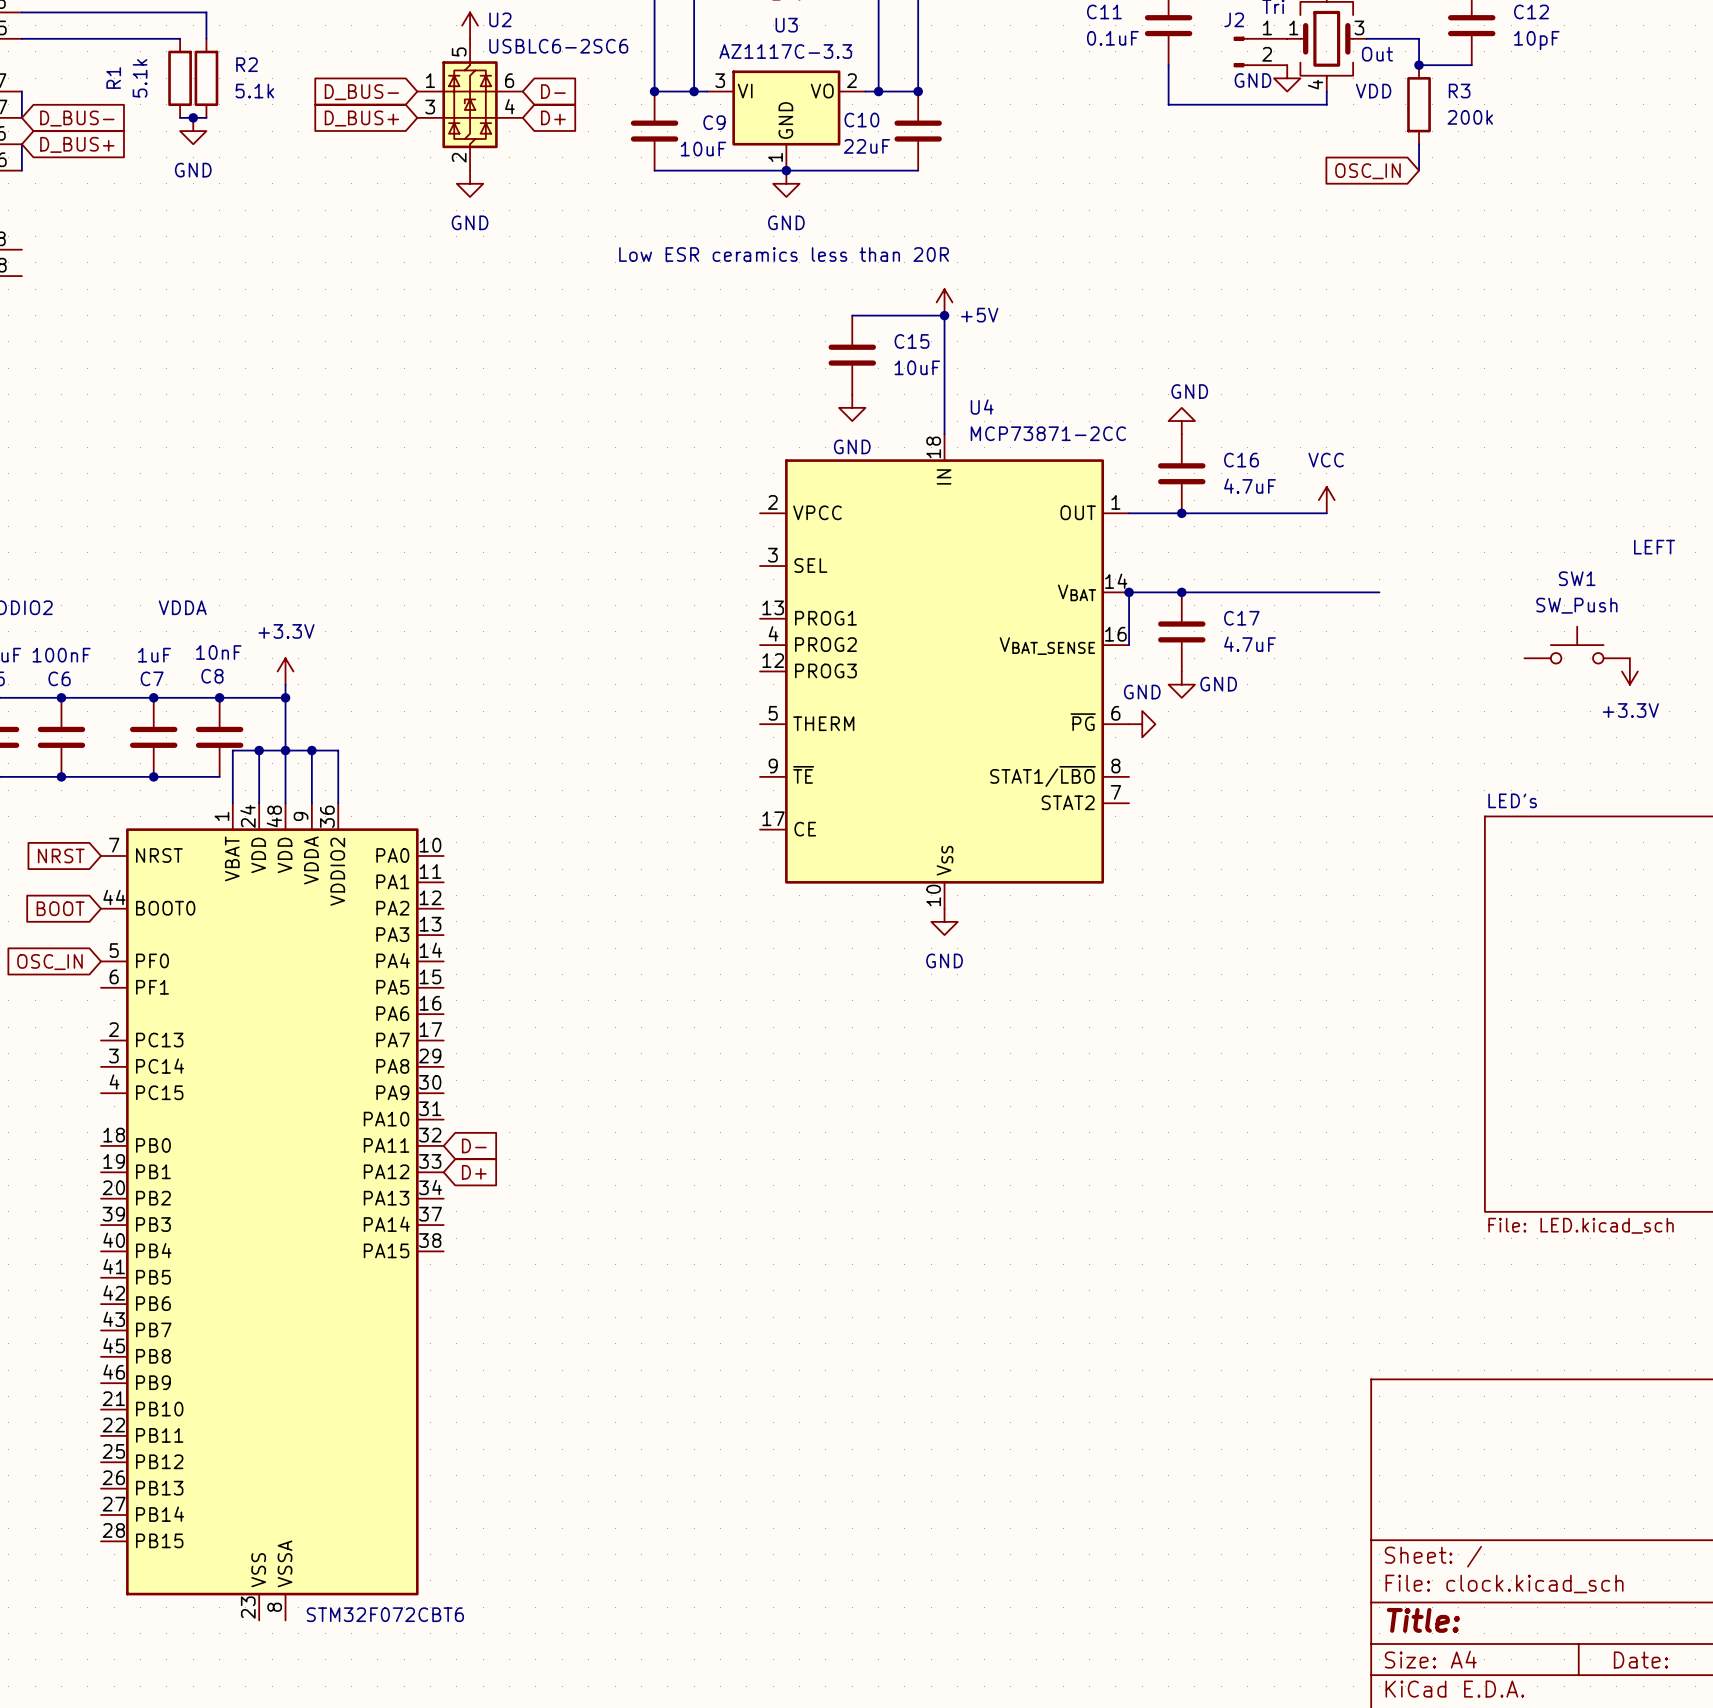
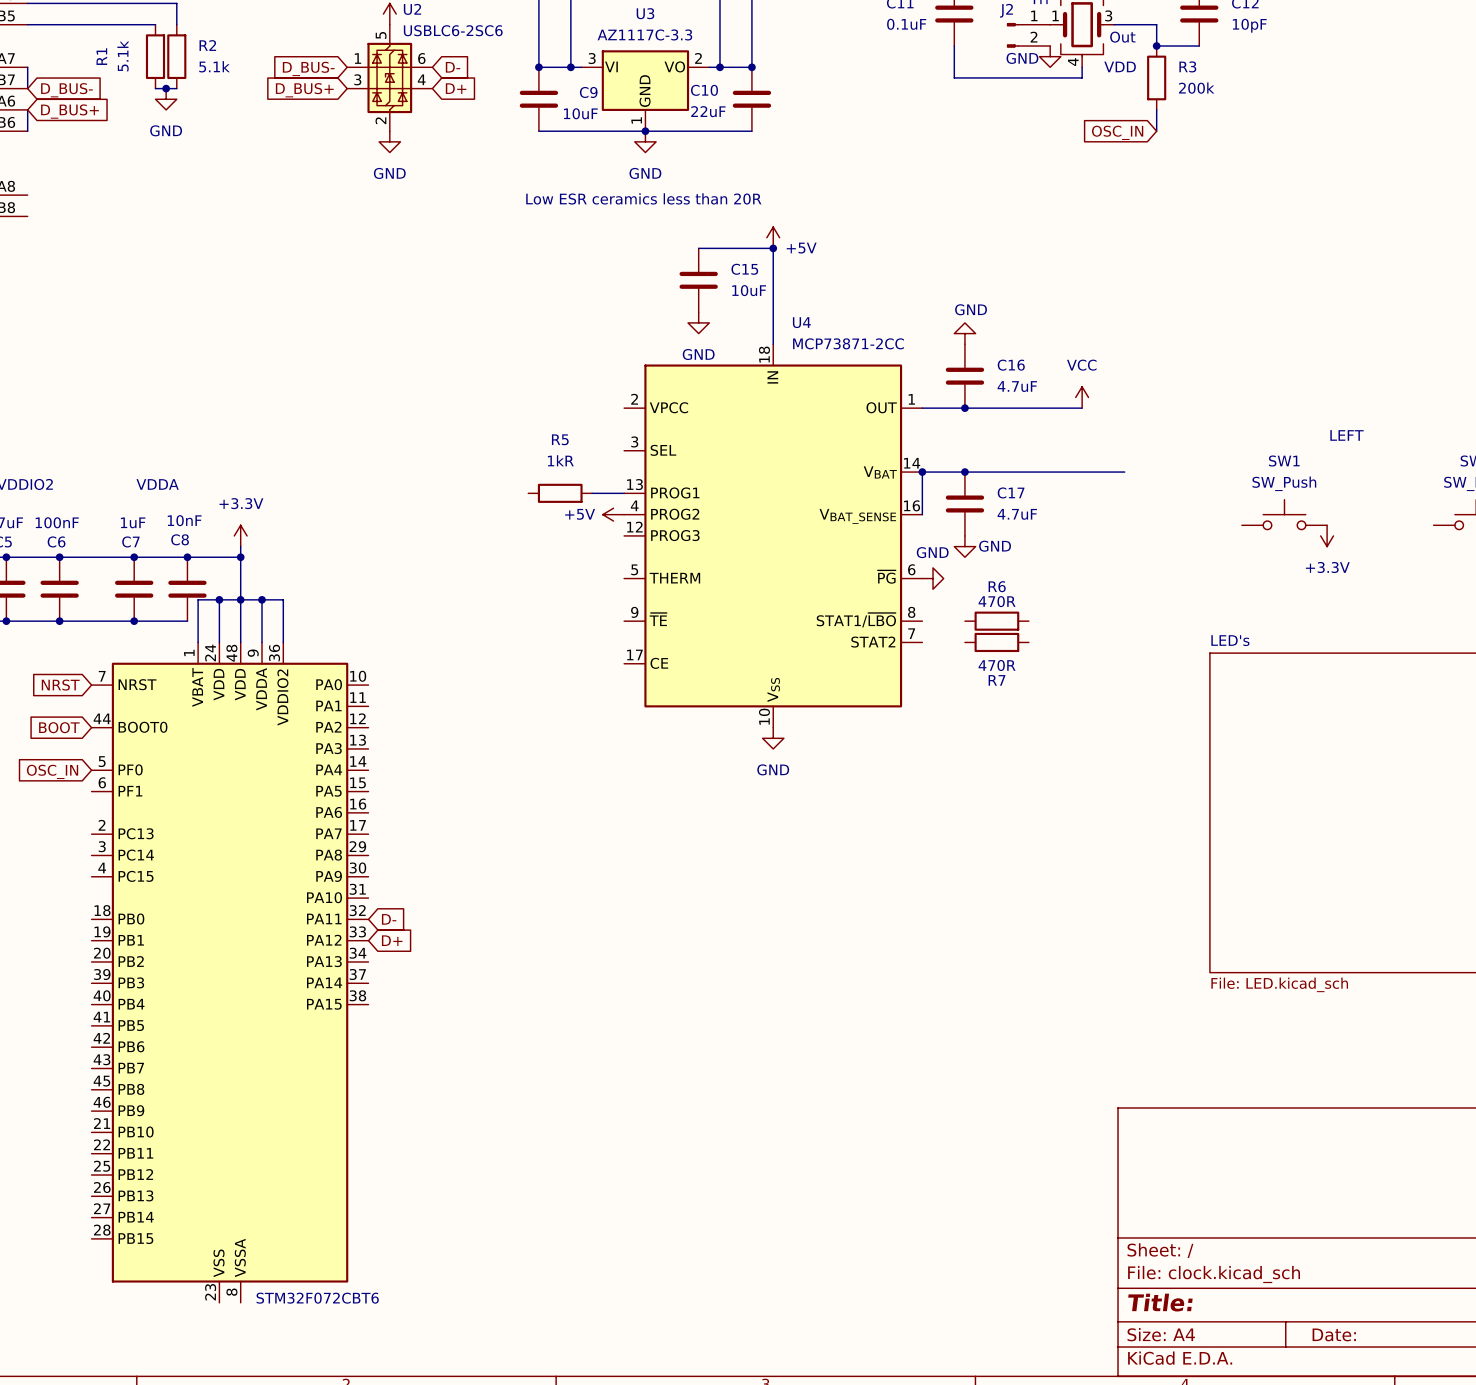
R5: none -> 1kR (560, 493)
wire: none -> (592, 493) (624, 493)
power symbol: none -> +5V (613, 514)
R6: none -> 470R (996, 621)
R7: none -> 470R (996, 642)

